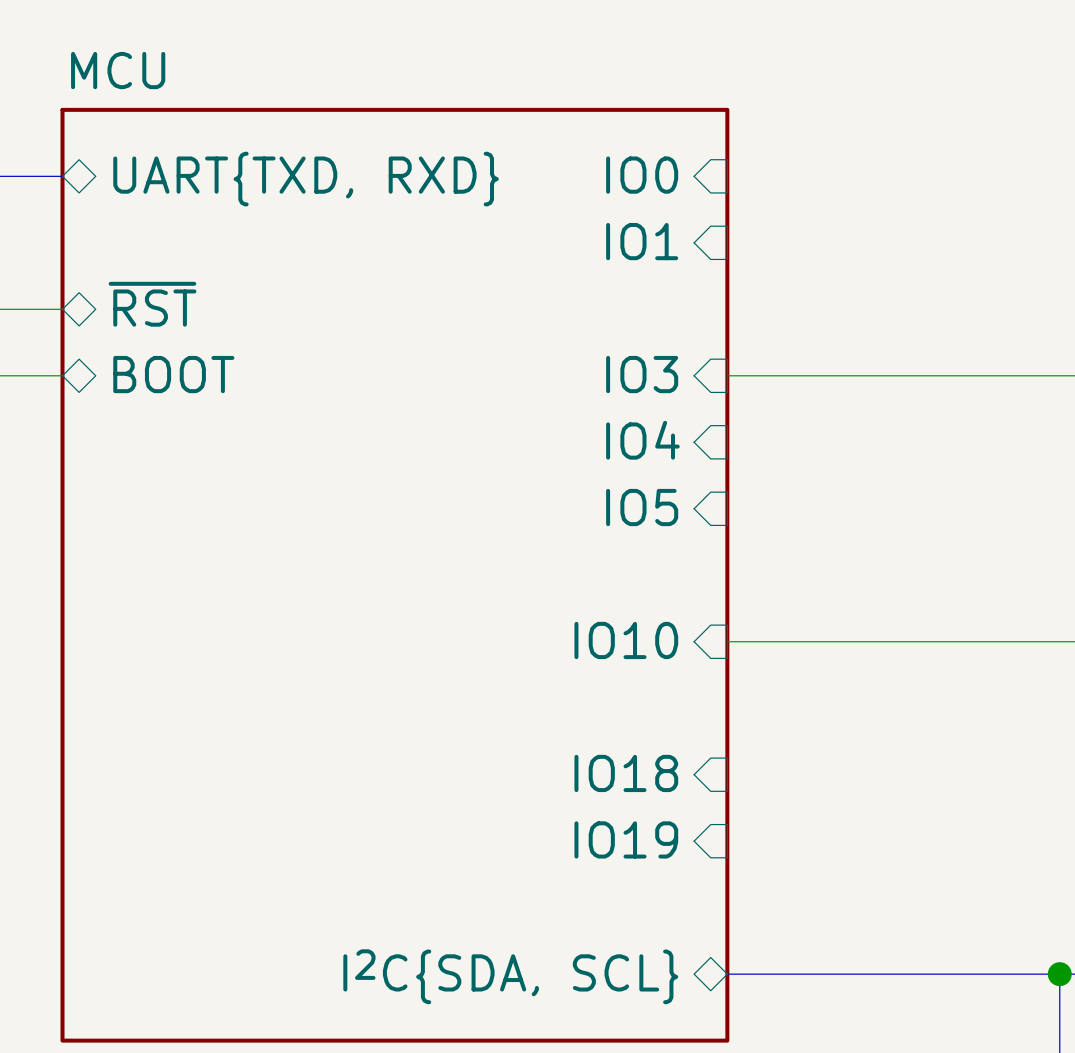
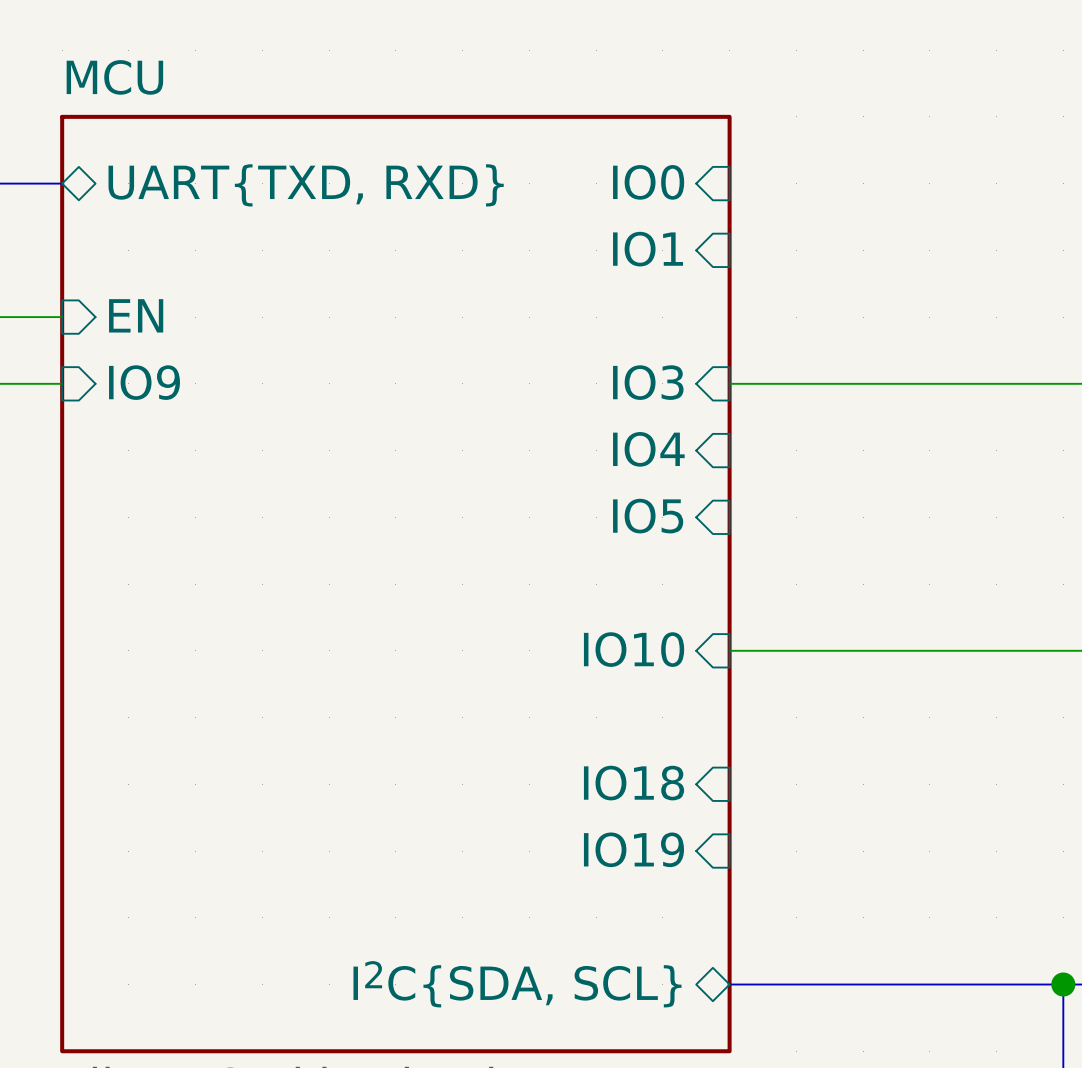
sheet pin shape: bidirectional (152, 304) -> input (136, 315)
sheet pin: ~{RST} (152, 304) -> EN (136, 315)
sheet pin shape: bidirectional (173, 374) -> input (144, 382)
sheet pin: BOOT (173, 374) -> IO9 (144, 382)

